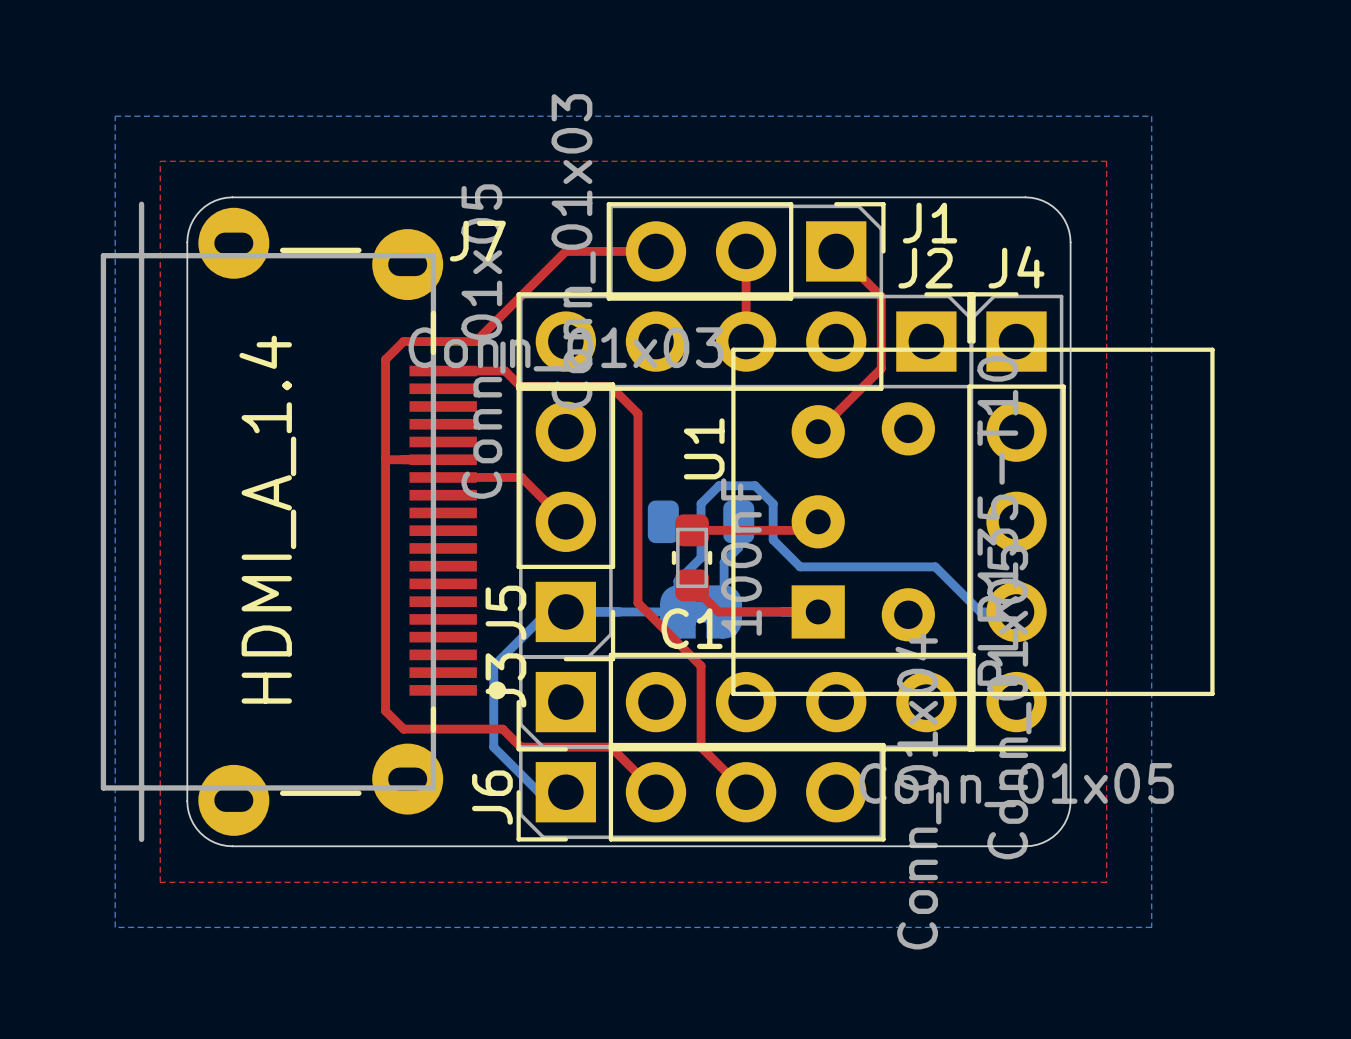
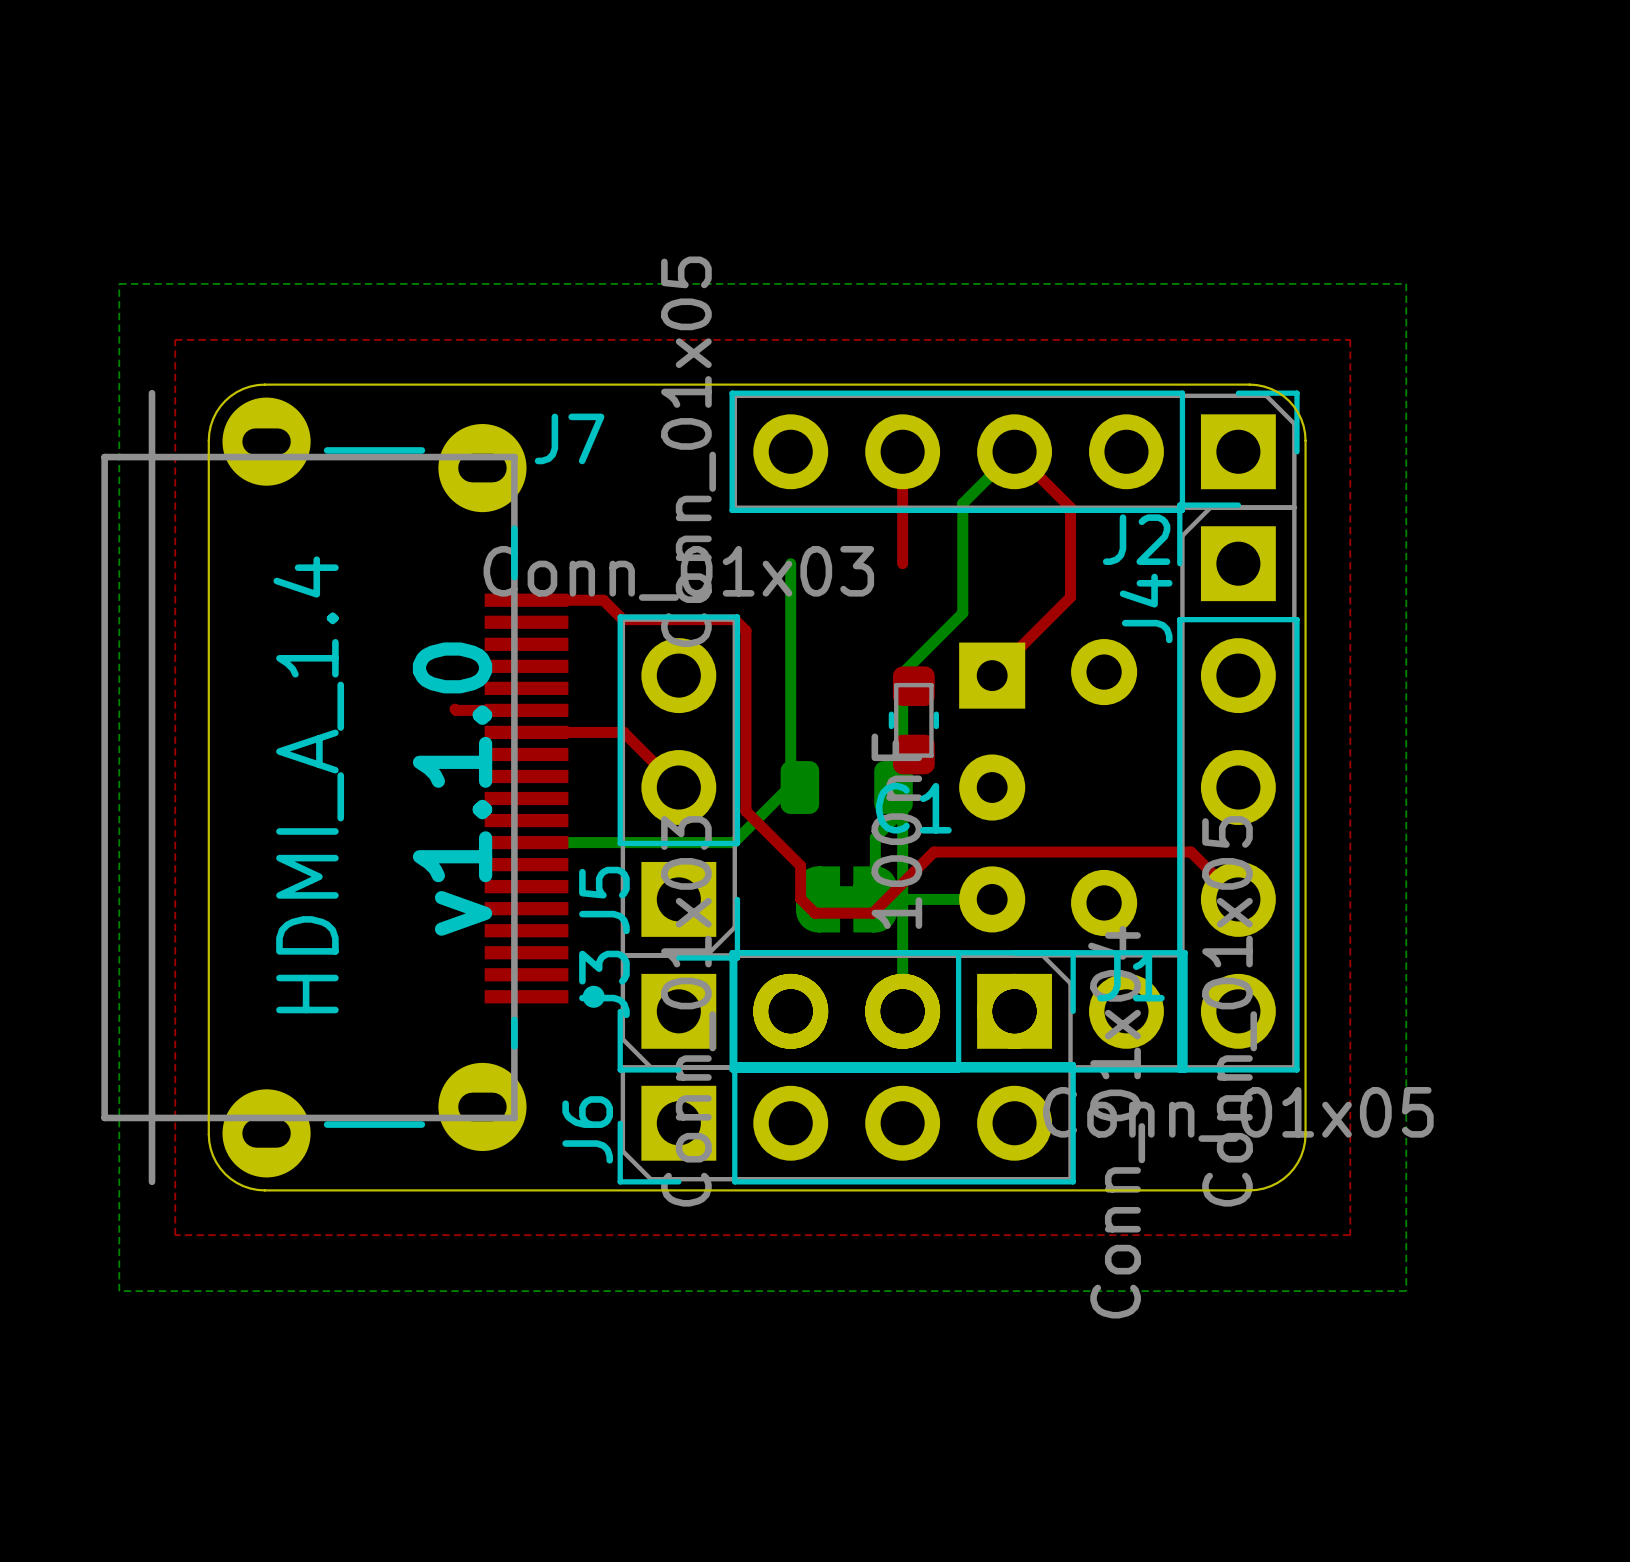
top track: (655, 251) (565, 251) (475, 341) (403, 341) (385, 359) (385, 711) (403, 729) (502, 729) (520, 747) (610, 747) (655, 792) -> none
J1 position: (746, 251) -> (902, 1011)
bottom track: none -> (1014, 451) (962, 503) (962, 613) (902, 673) (902, 1011)
J4 name rotation: 0° (1016, 267) -> 90° counterclockwise (1146, 608)
J4 name position: J4 (1016, 267) -> J4 (1146, 608)
J2 name position: J2 (925, 268) -> J2 (1136, 539)
bottom track: none -> (790, 563) (790, 785) (733, 842) (526, 842)
J2 position: (746, 341) -> (1014, 451)
top track: (619, 395) (637, 413) (637, 602) (701, 666) (701, 747) (746, 792) -> (745, 630) (745, 811) (800, 865) (800, 898) (815, 913) (872, 913) (933, 852) (1191, 852) (1238, 899)
U1 side: top (972, 521) -> bottom (1048, 787)
text: none -> v1.1.0 (452, 789)
top track: (692, 530) (809, 530) -> none
C1 position: (692, 557) -> (913, 720)
top track: (692, 585) (718, 611) (818, 611) -> none
bottom track: (677, 611) (547, 611) (493, 666) (493, 747) (538, 792) (565, 792) -> none
bottom track: (677, 611) (677, 580) (701, 557) (701, 503) (719, 485) (755, 485) (773, 503) (773, 539) (800, 566) (935, 566) (980, 611) (1016, 611) -> none

